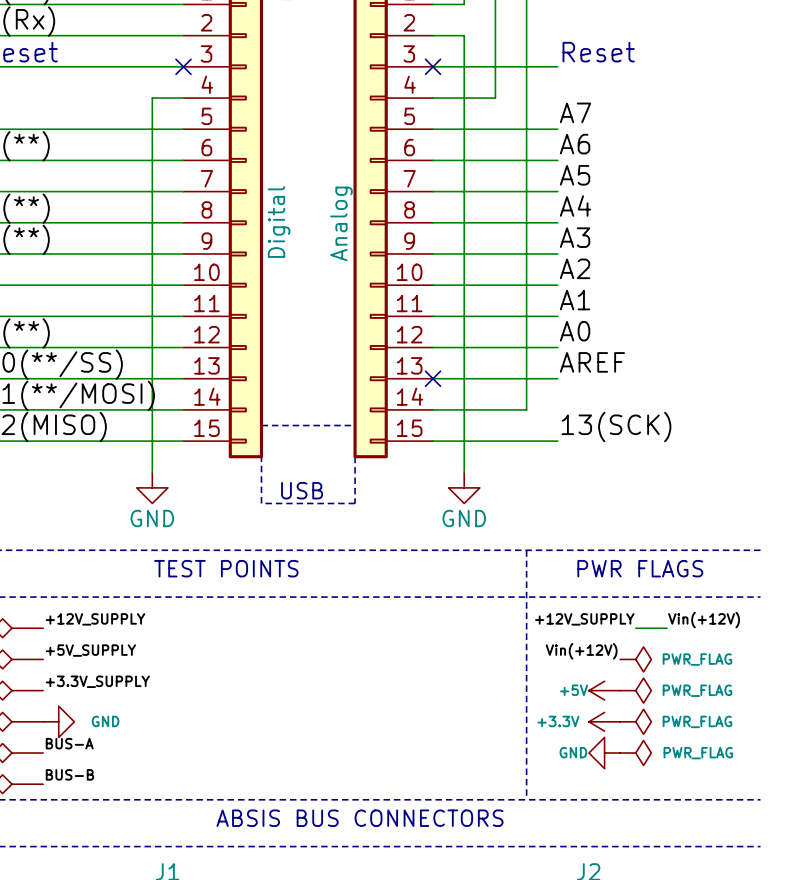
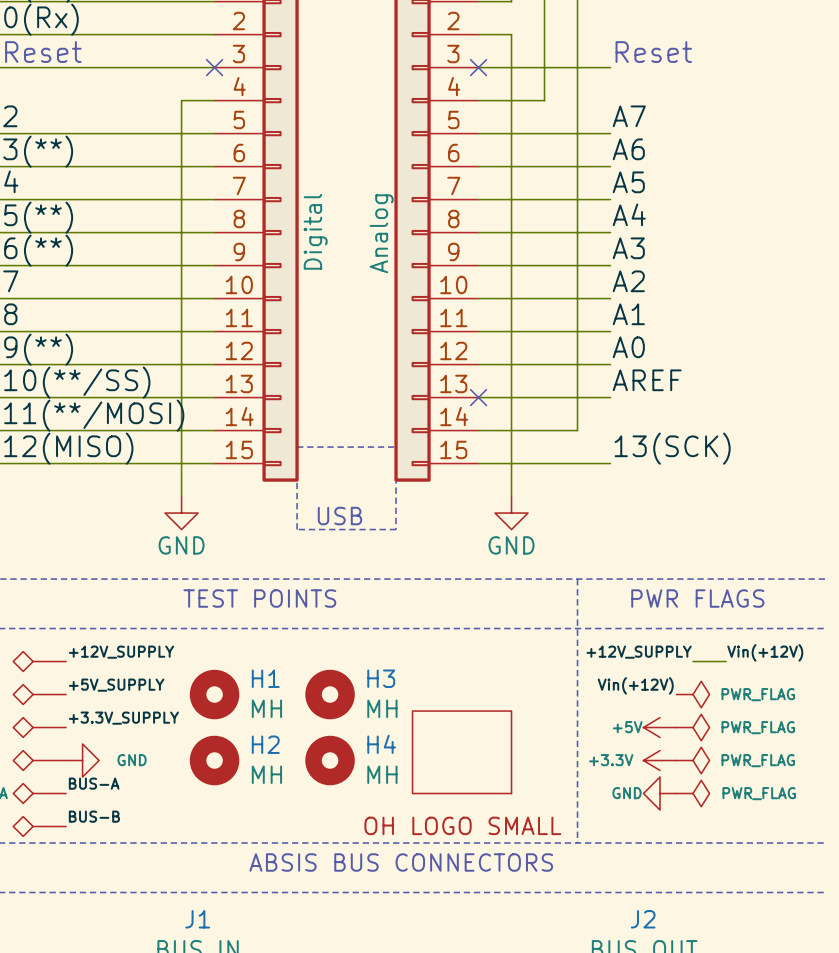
H1: none -> MH (214, 694)
H3: none -> MH (330, 694)
part: none -> (462, 752)
H2: none -> MH (214, 760)
H4: none -> MH (330, 760)

